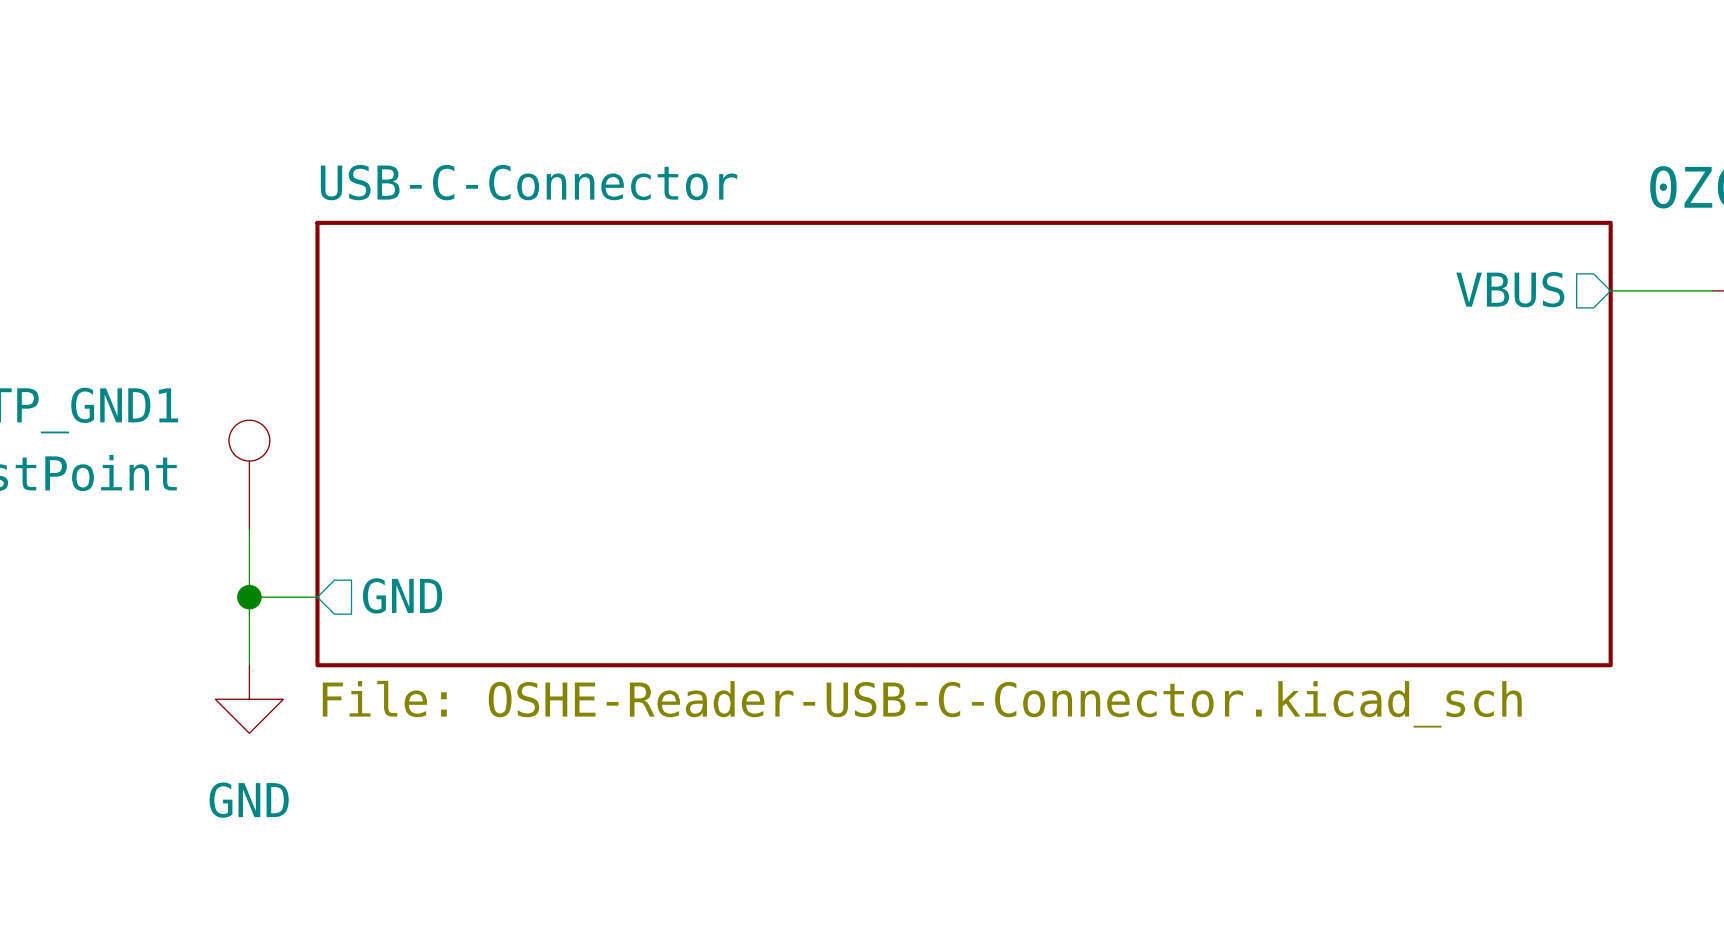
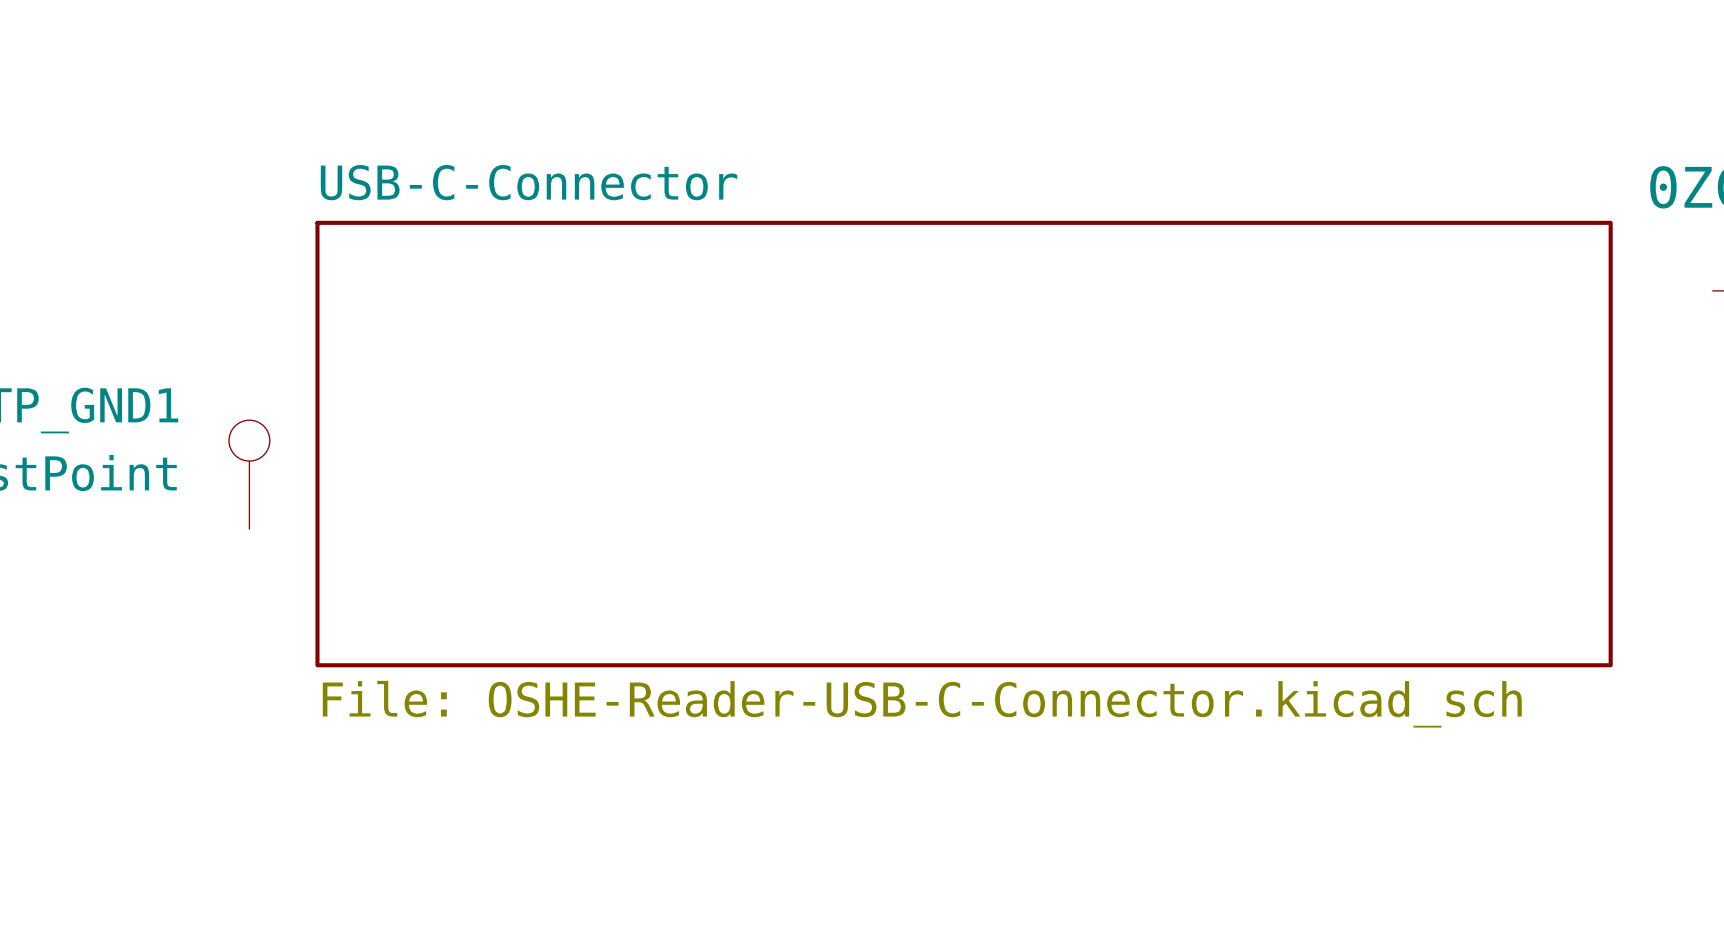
sheet pin: VBUS (1510, 289) -> none
wire: (1610, 290) (1712, 290) -> none
wire: (249, 529) (249, 665) -> none
sheet pin: GND (402, 595) -> none
wire: (249, 597) (317, 597) -> none
junction: (249, 597) -> none
power symbol: GND (249, 699) -> none

